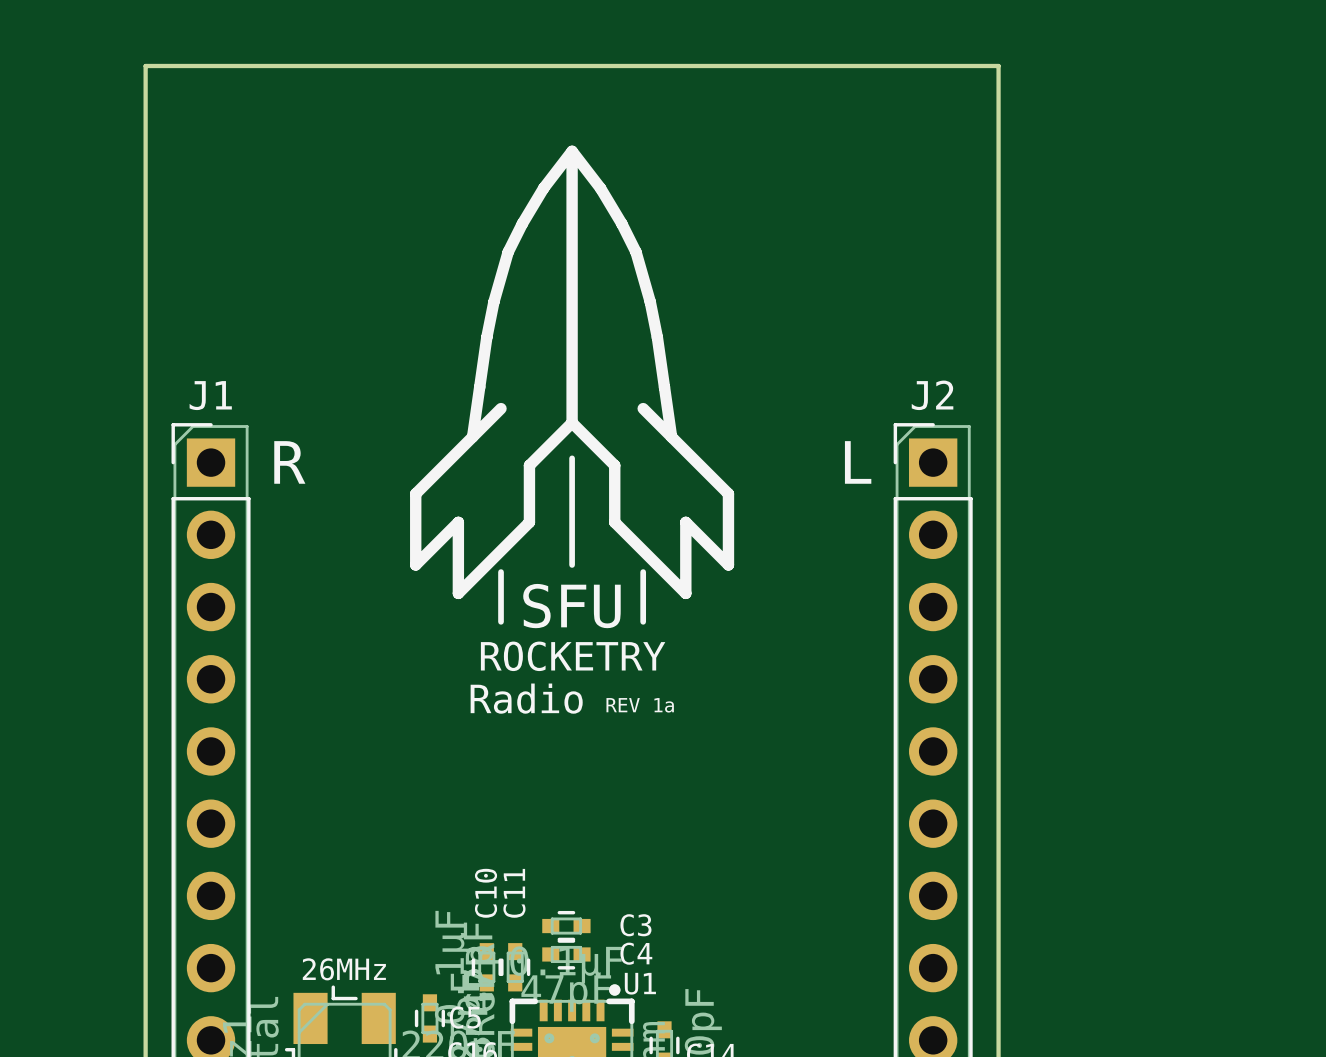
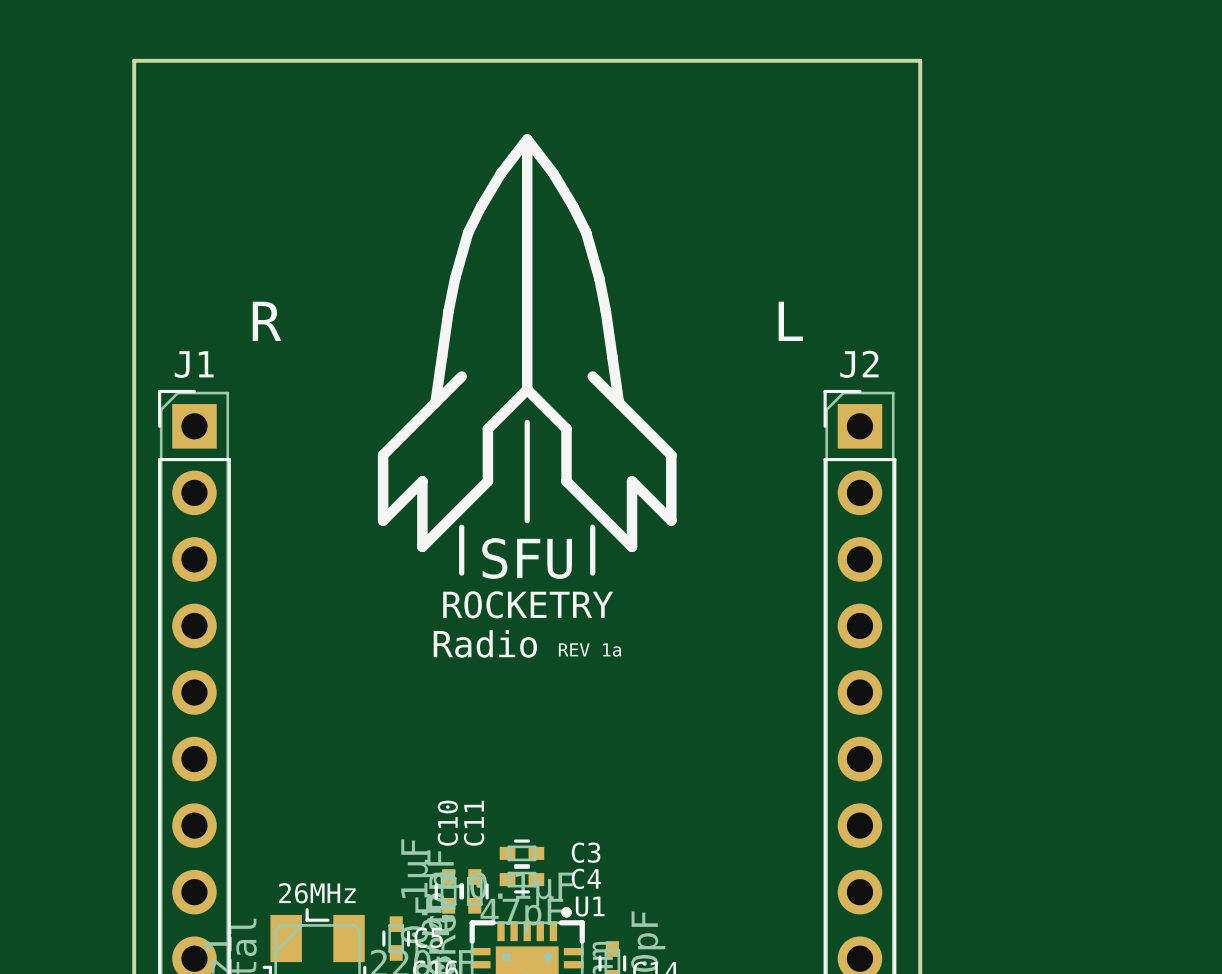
text position: R (289, 462) -> R (267, 321)
text position: L (858, 462) -> L (790, 321)

